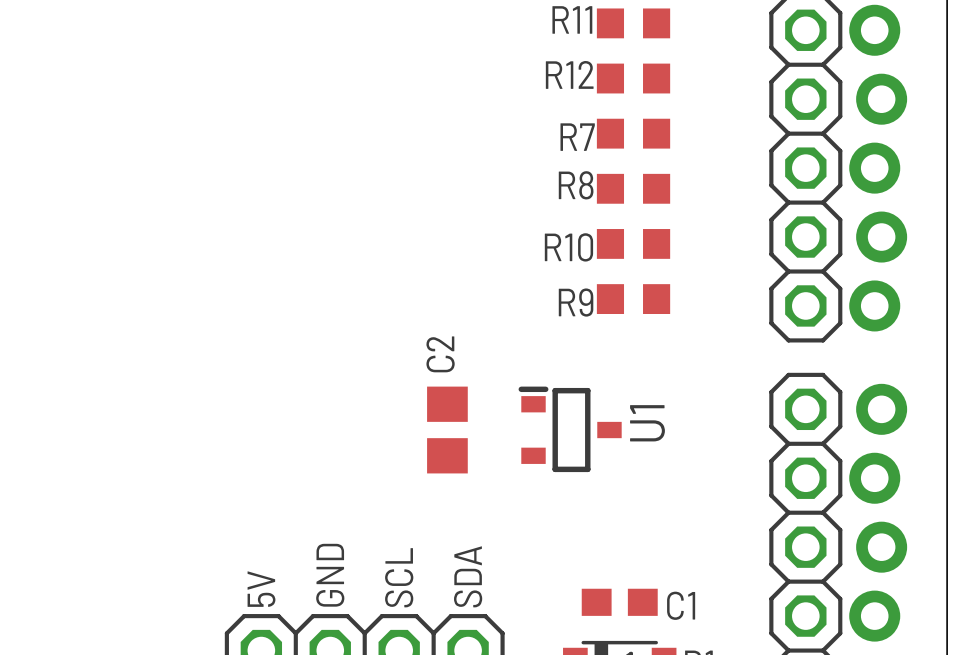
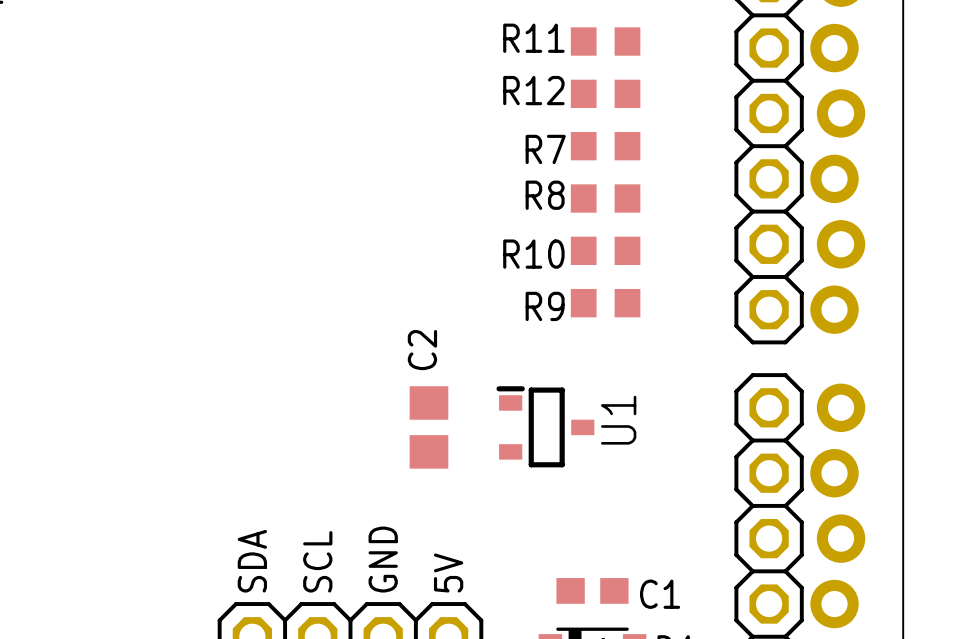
text: GND (330, 575) -> SCL (317, 561)
text: SDA (468, 576) -> 5V (448, 573)
text: SCL (399, 577) -> GND (383, 559)
text: 5V (261, 589) -> SDA (252, 561)

